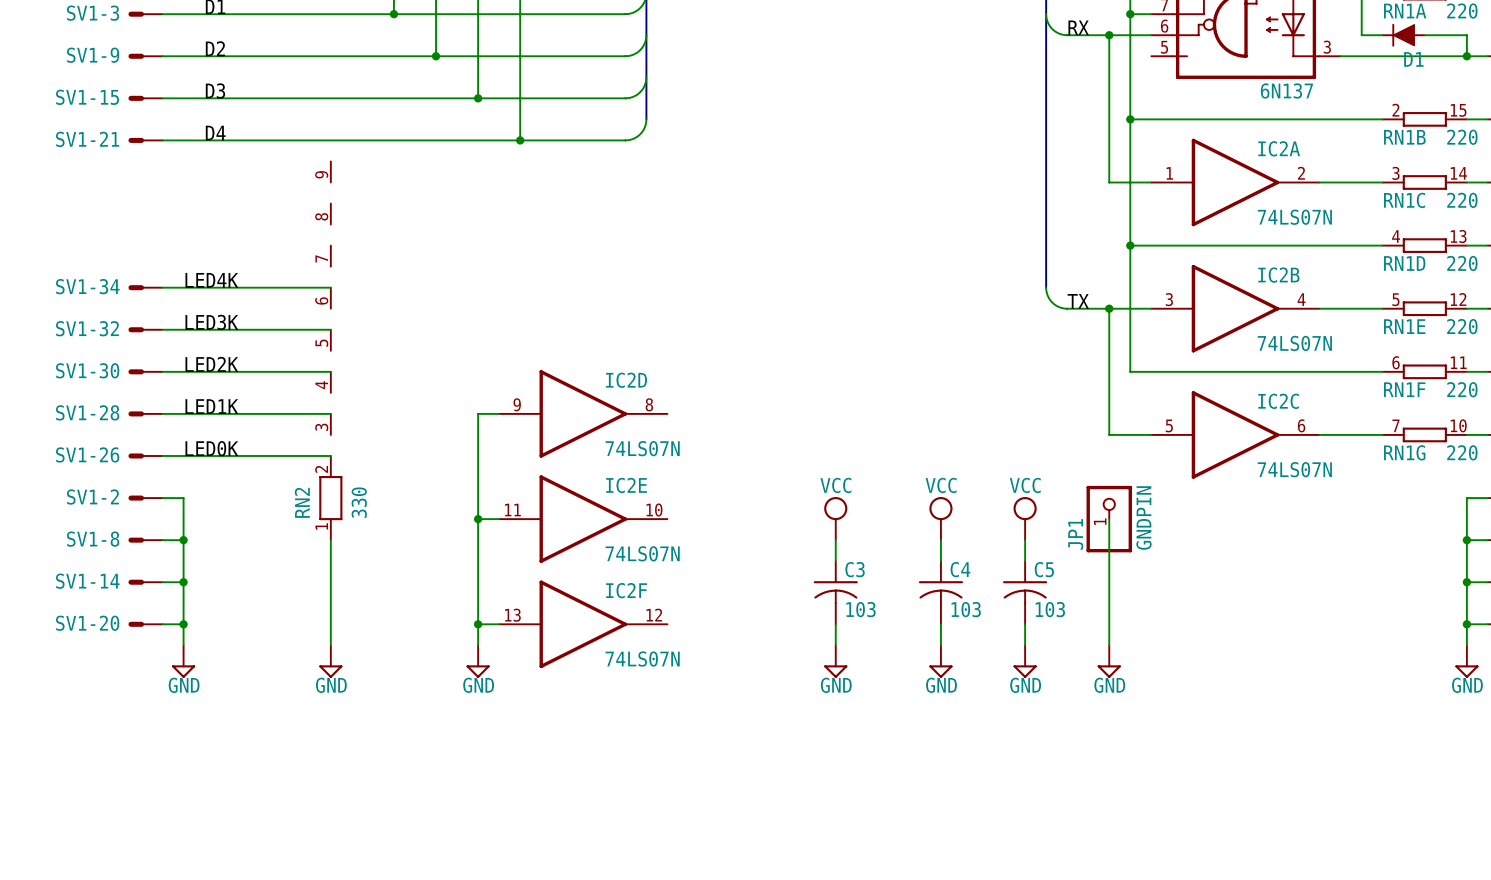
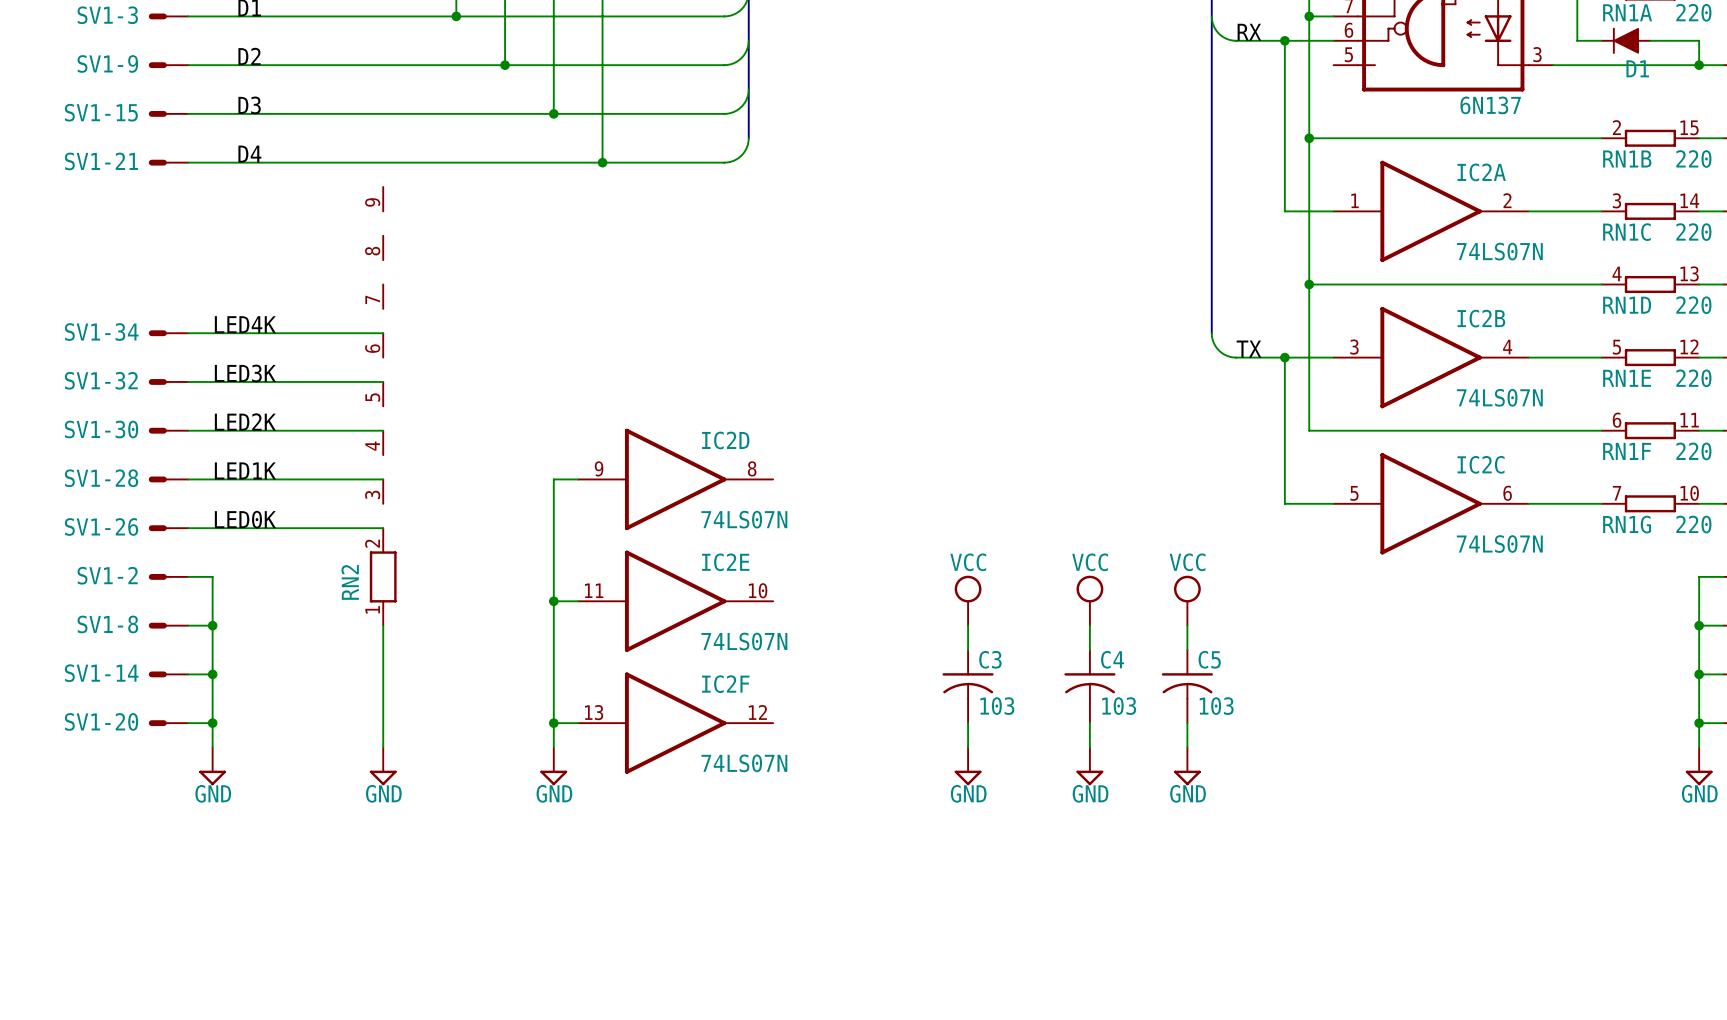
RN2 value: 330 (359, 502) -> none
wire: (1109, 519) (1109, 645) -> none
JP1: GNDPIN (1109, 519) -> none
power symbol: GND (1109, 661) -> none

